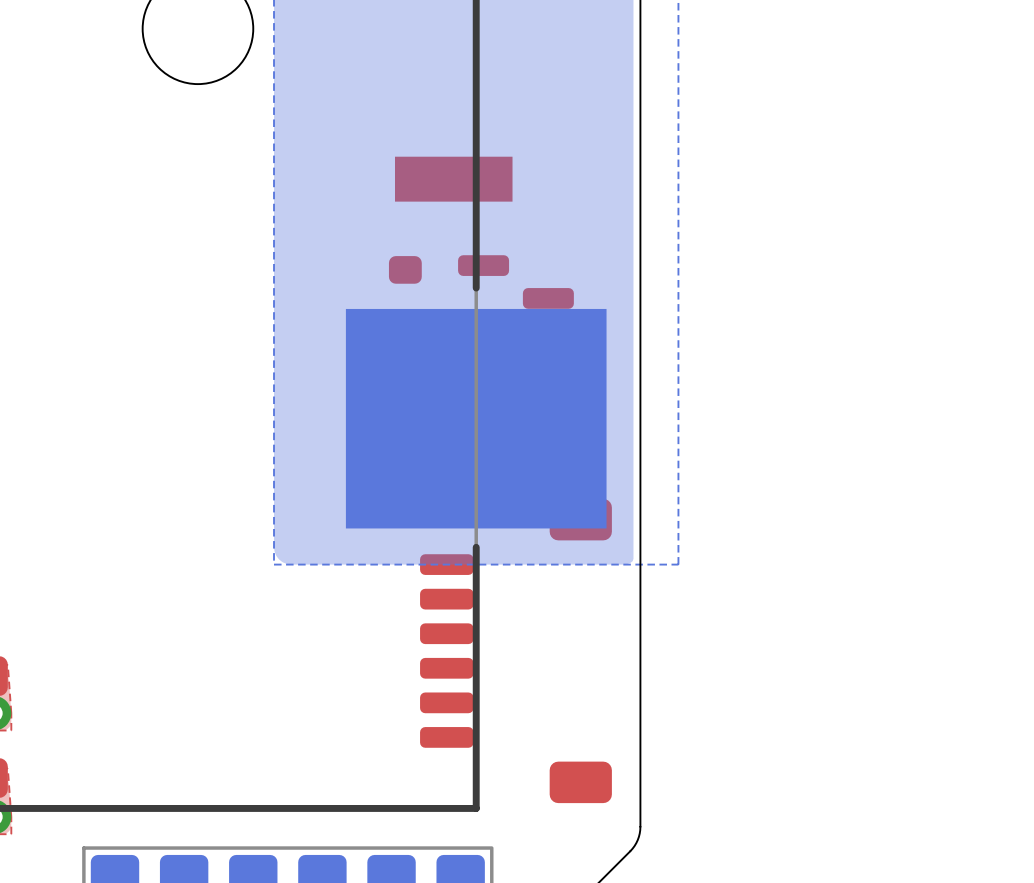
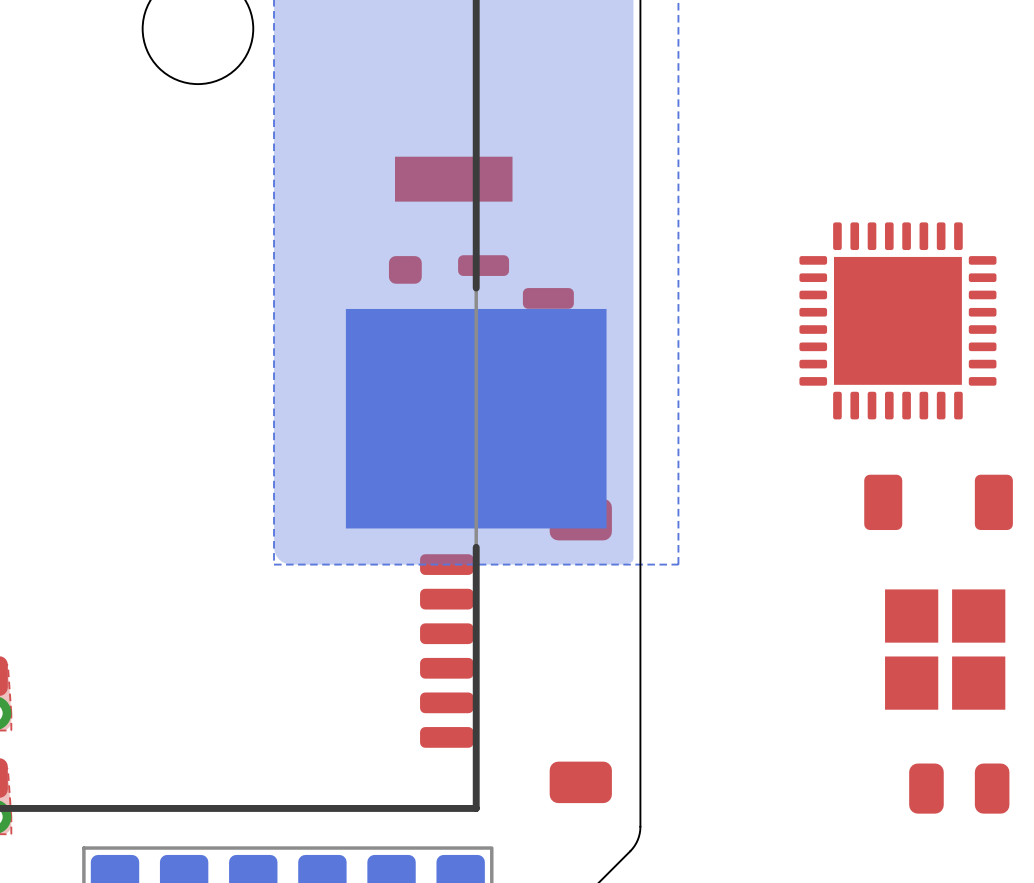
part: none -> (897, 320)
part: none -> (938, 502)
part: none -> (945, 649)
part: none -> (959, 788)

